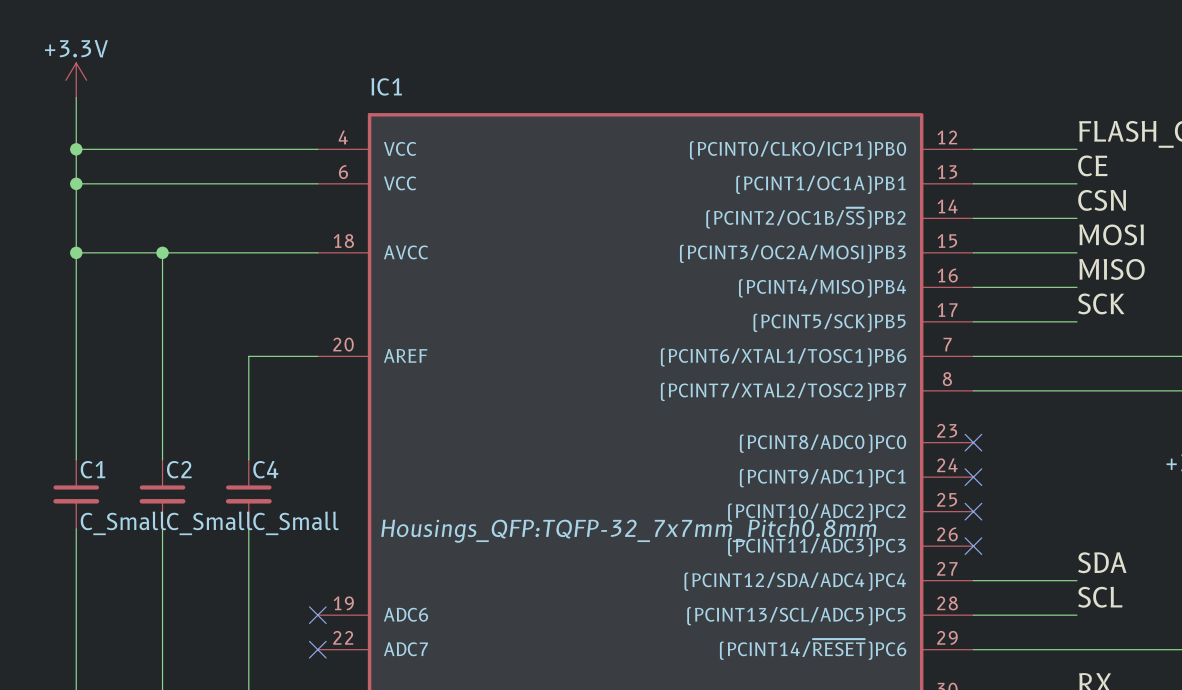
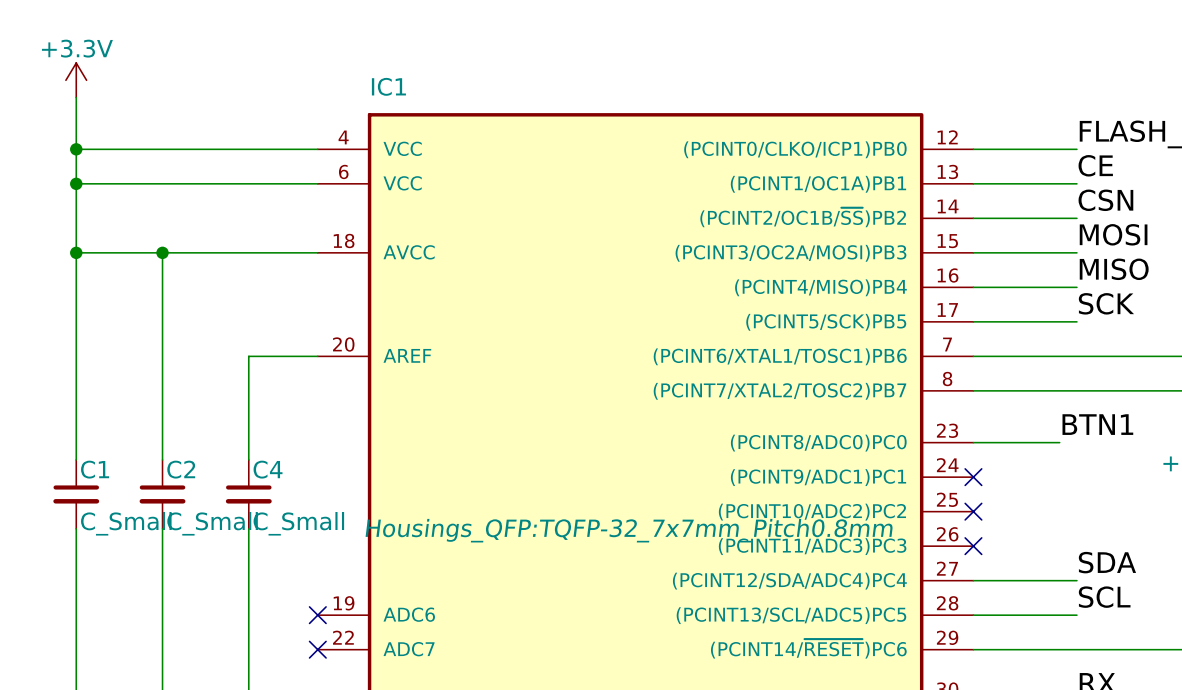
label: none -> BTN1 (1097, 424)
wire: none -> (973, 442) (1059, 442)
no-connect mark: (973, 442) -> none

